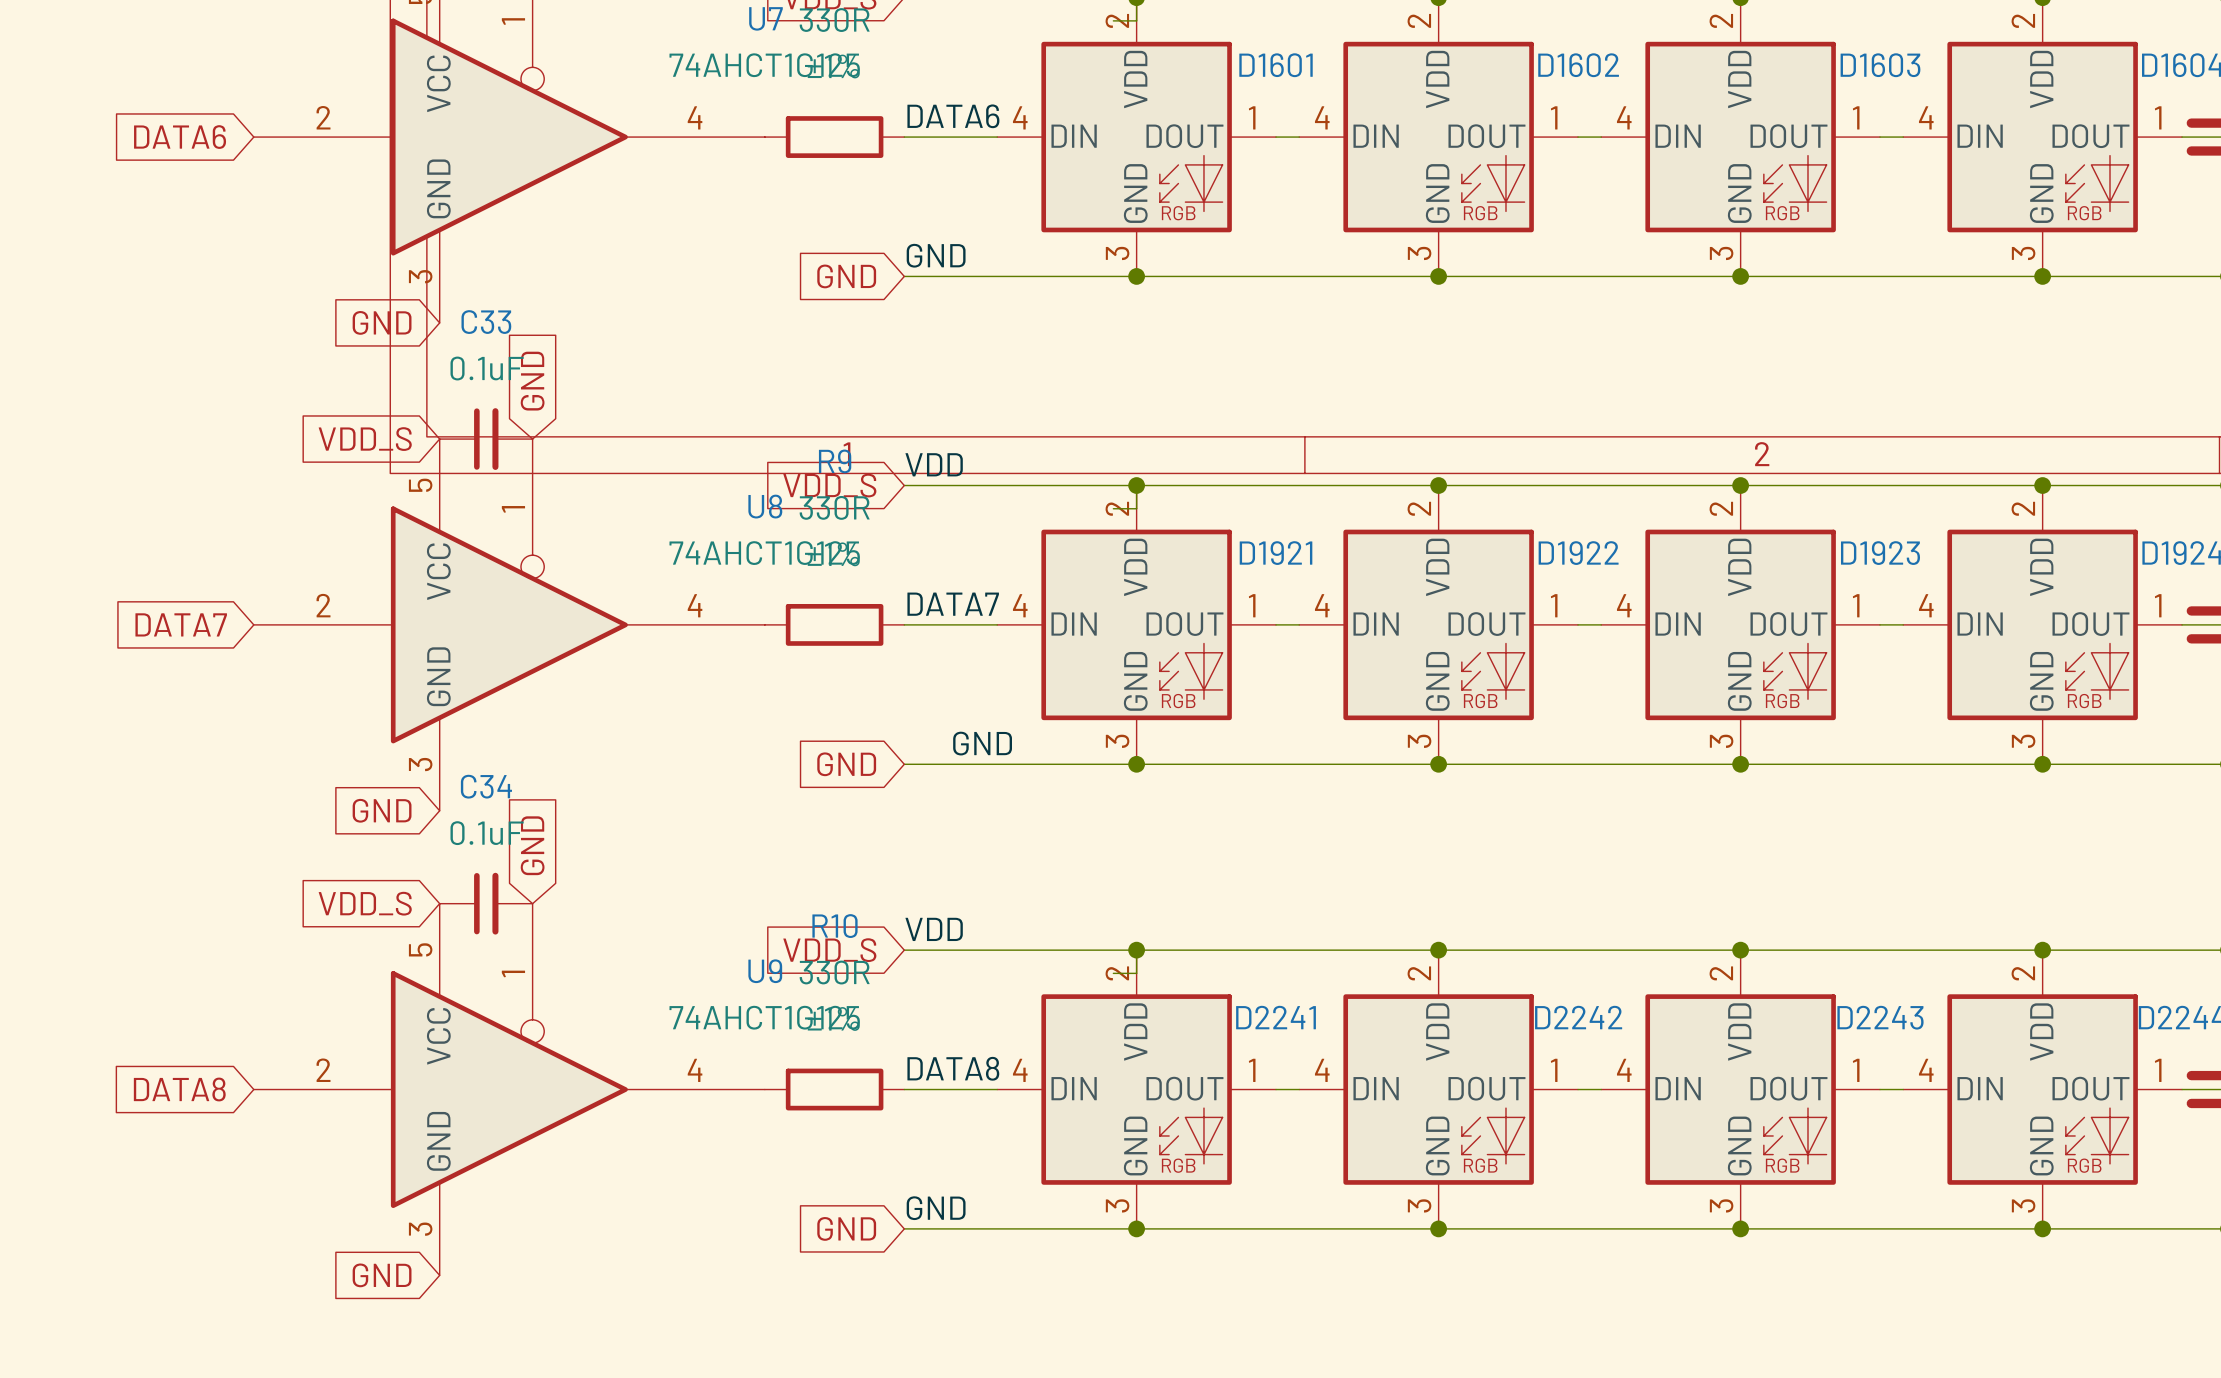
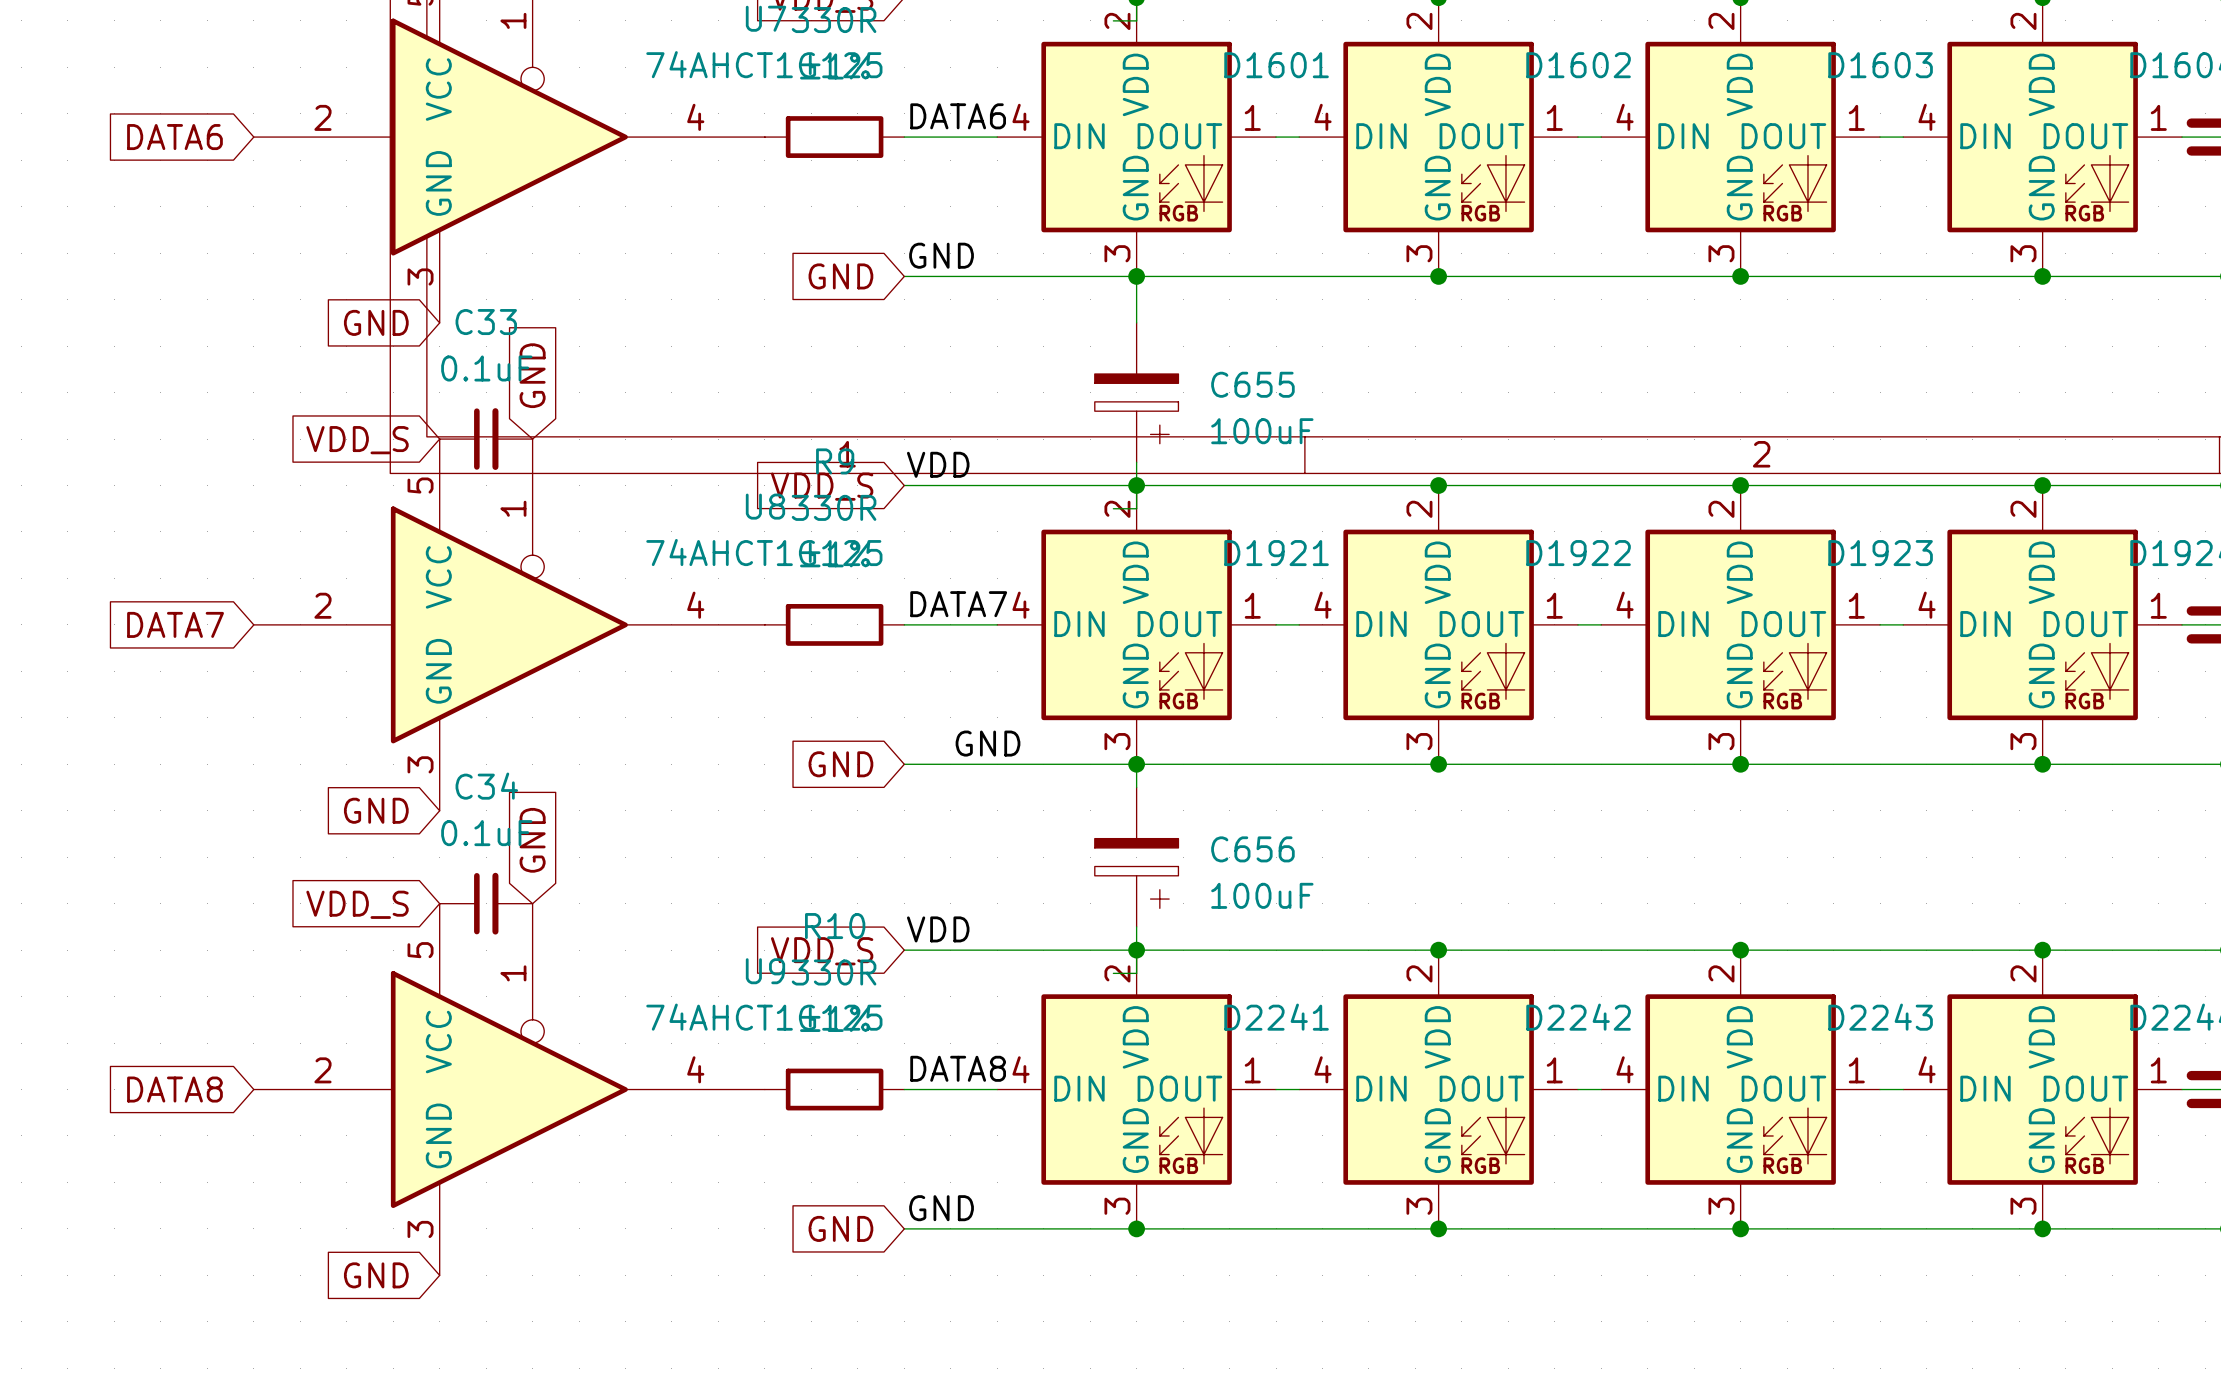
wire: none -> (1136, 276) (1136, 322)
C655: none -> (1136, 392)
wire: none -> (1136, 462) (1136, 485)
wire: none -> (1136, 764) (1136, 787)
C656: none -> (1136, 857)
wire: none -> (1136, 926) (1136, 950)

